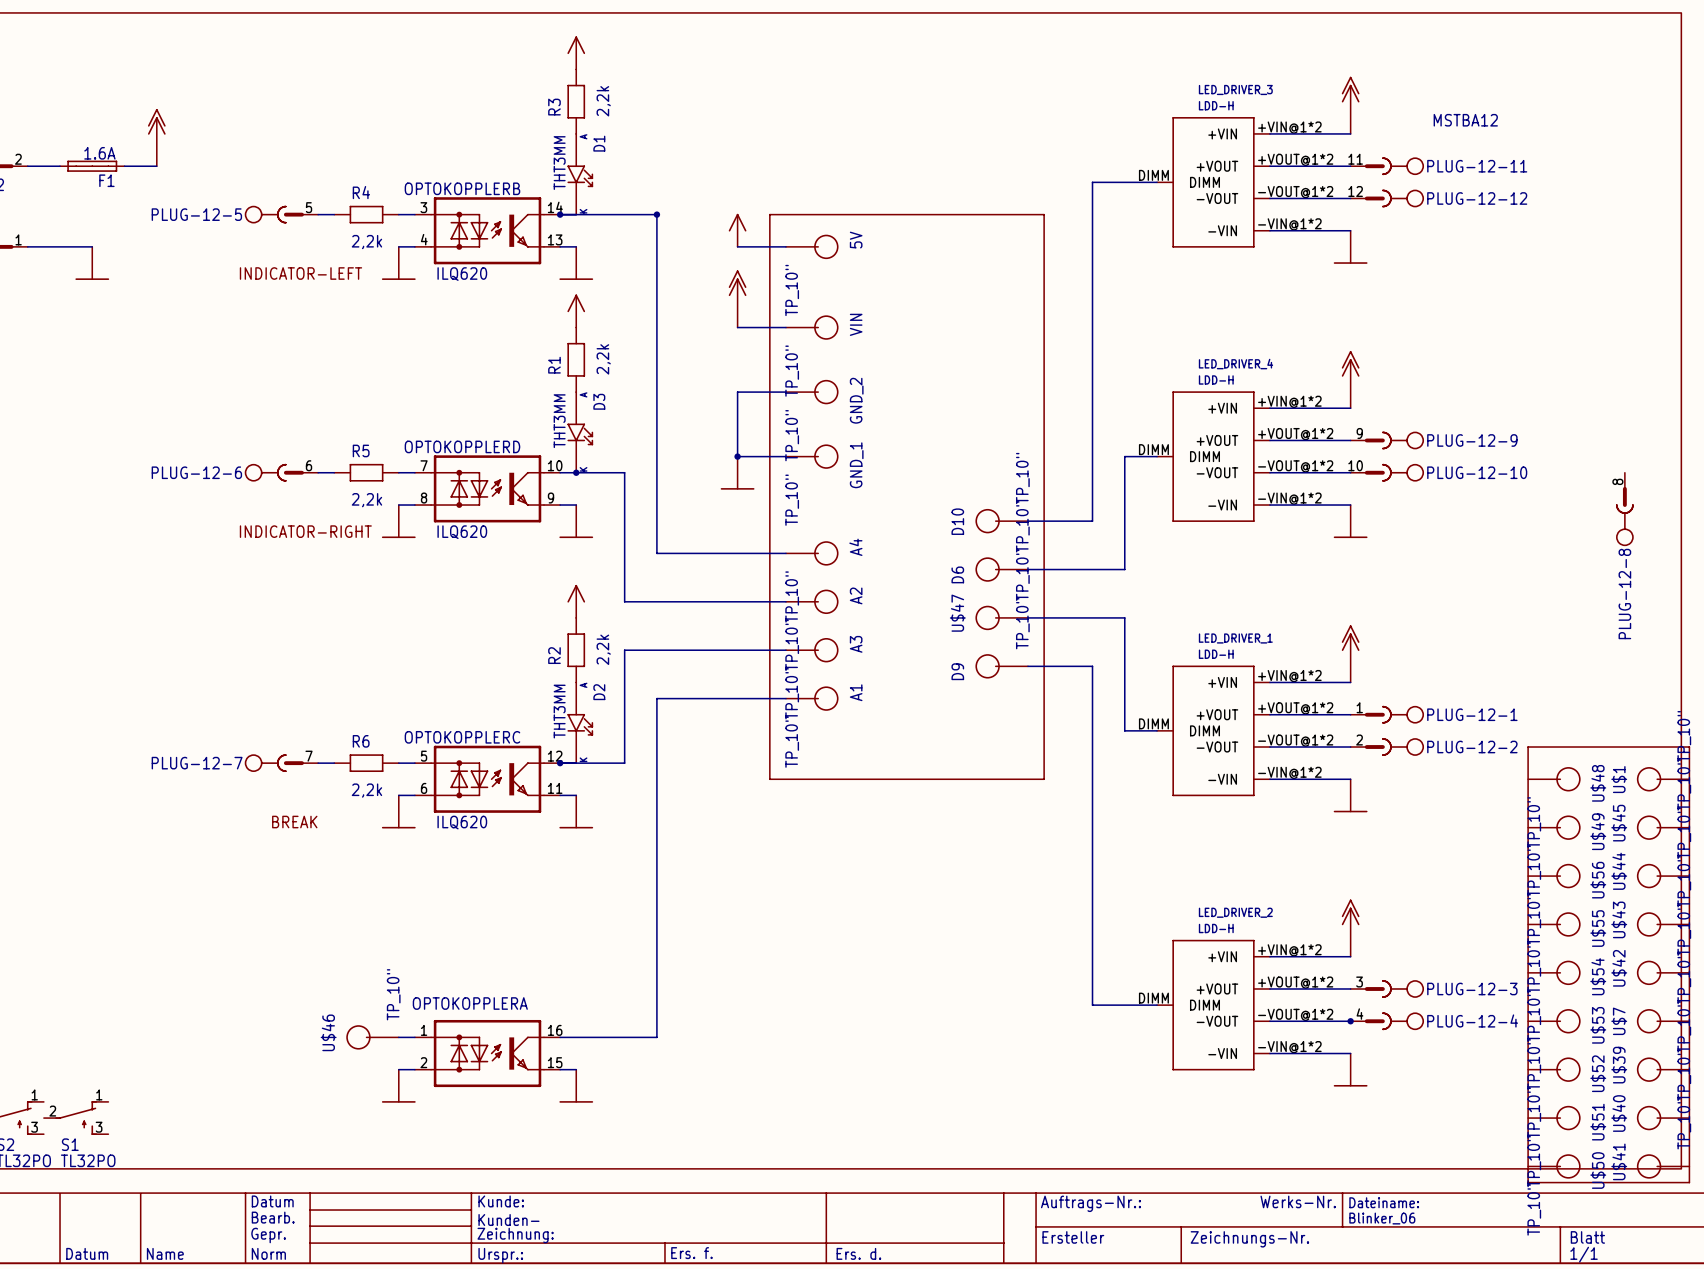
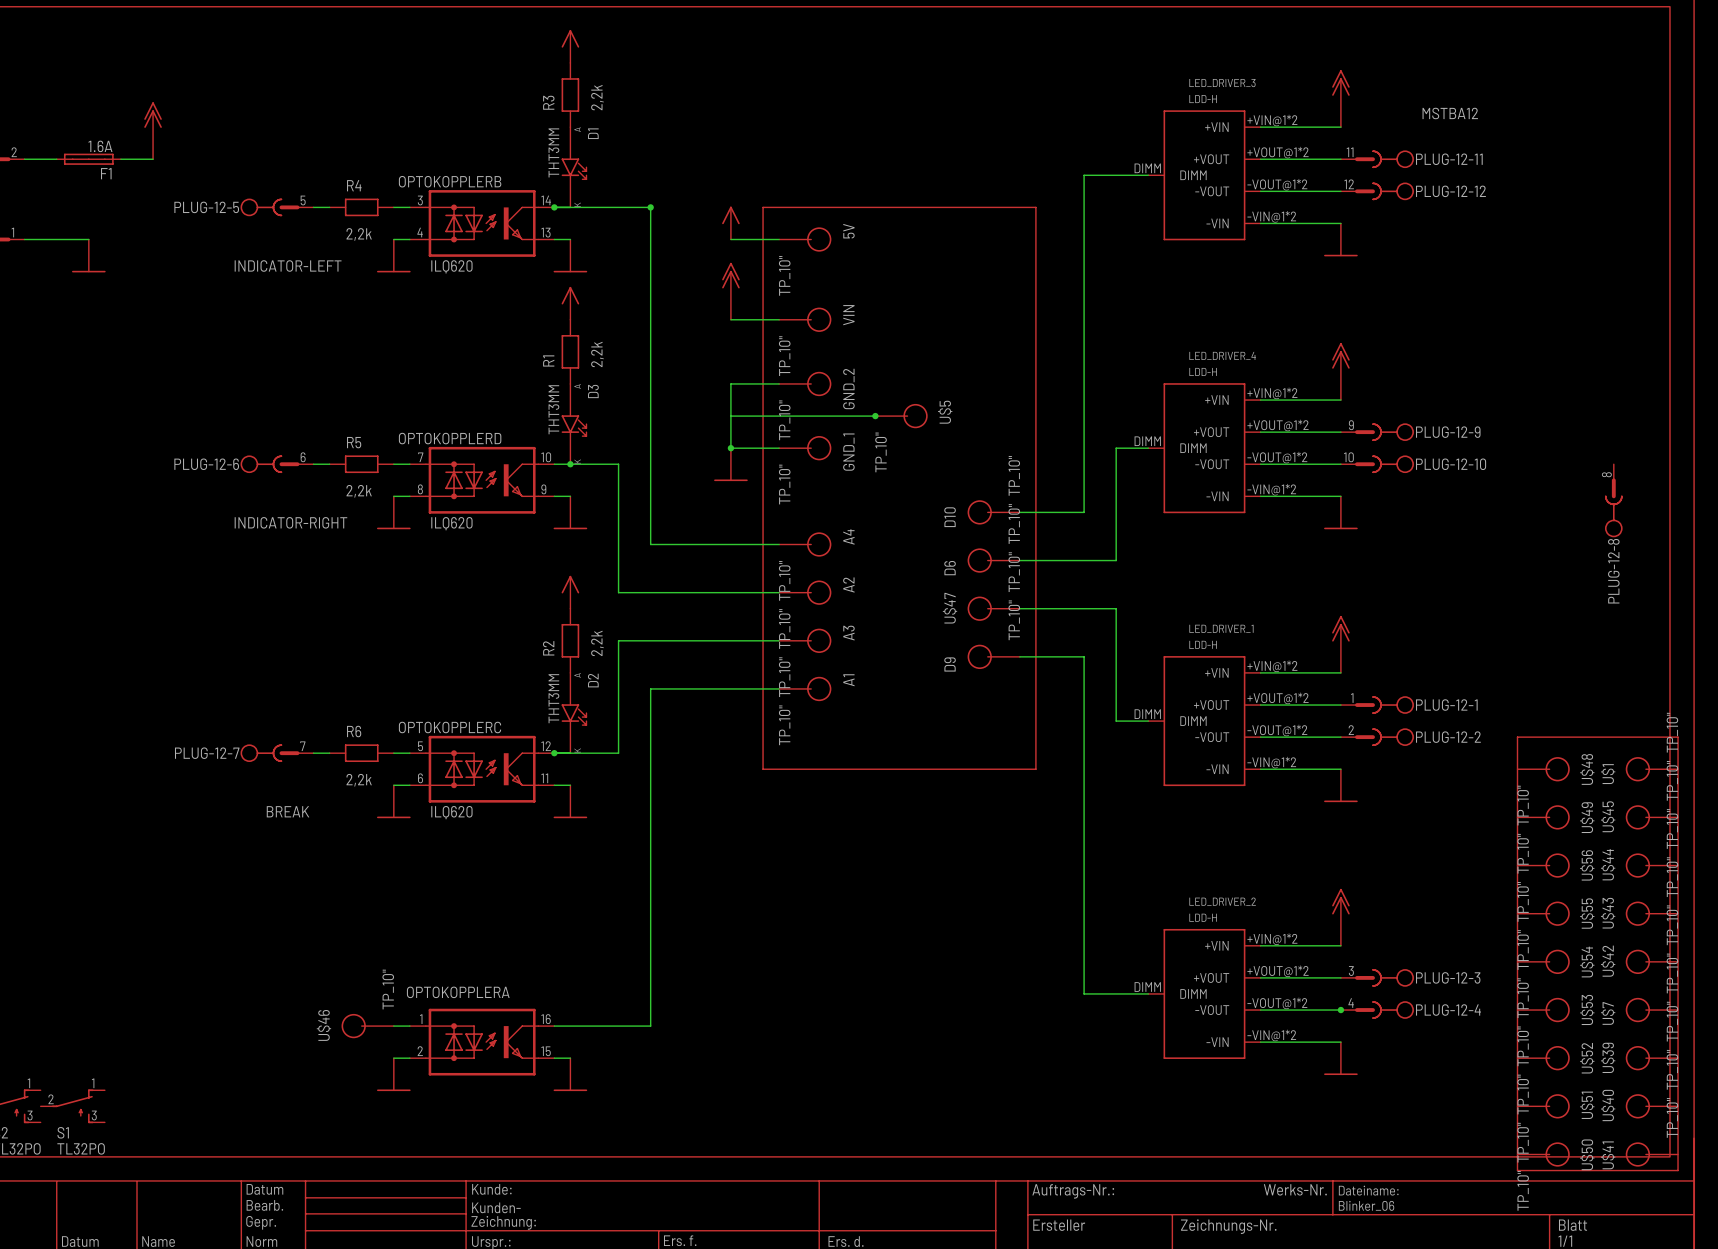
wire: none -> (730, 416) (875, 416)
junction: none -> (875, 416)
U$5: none -> TP_10" (901, 416)

